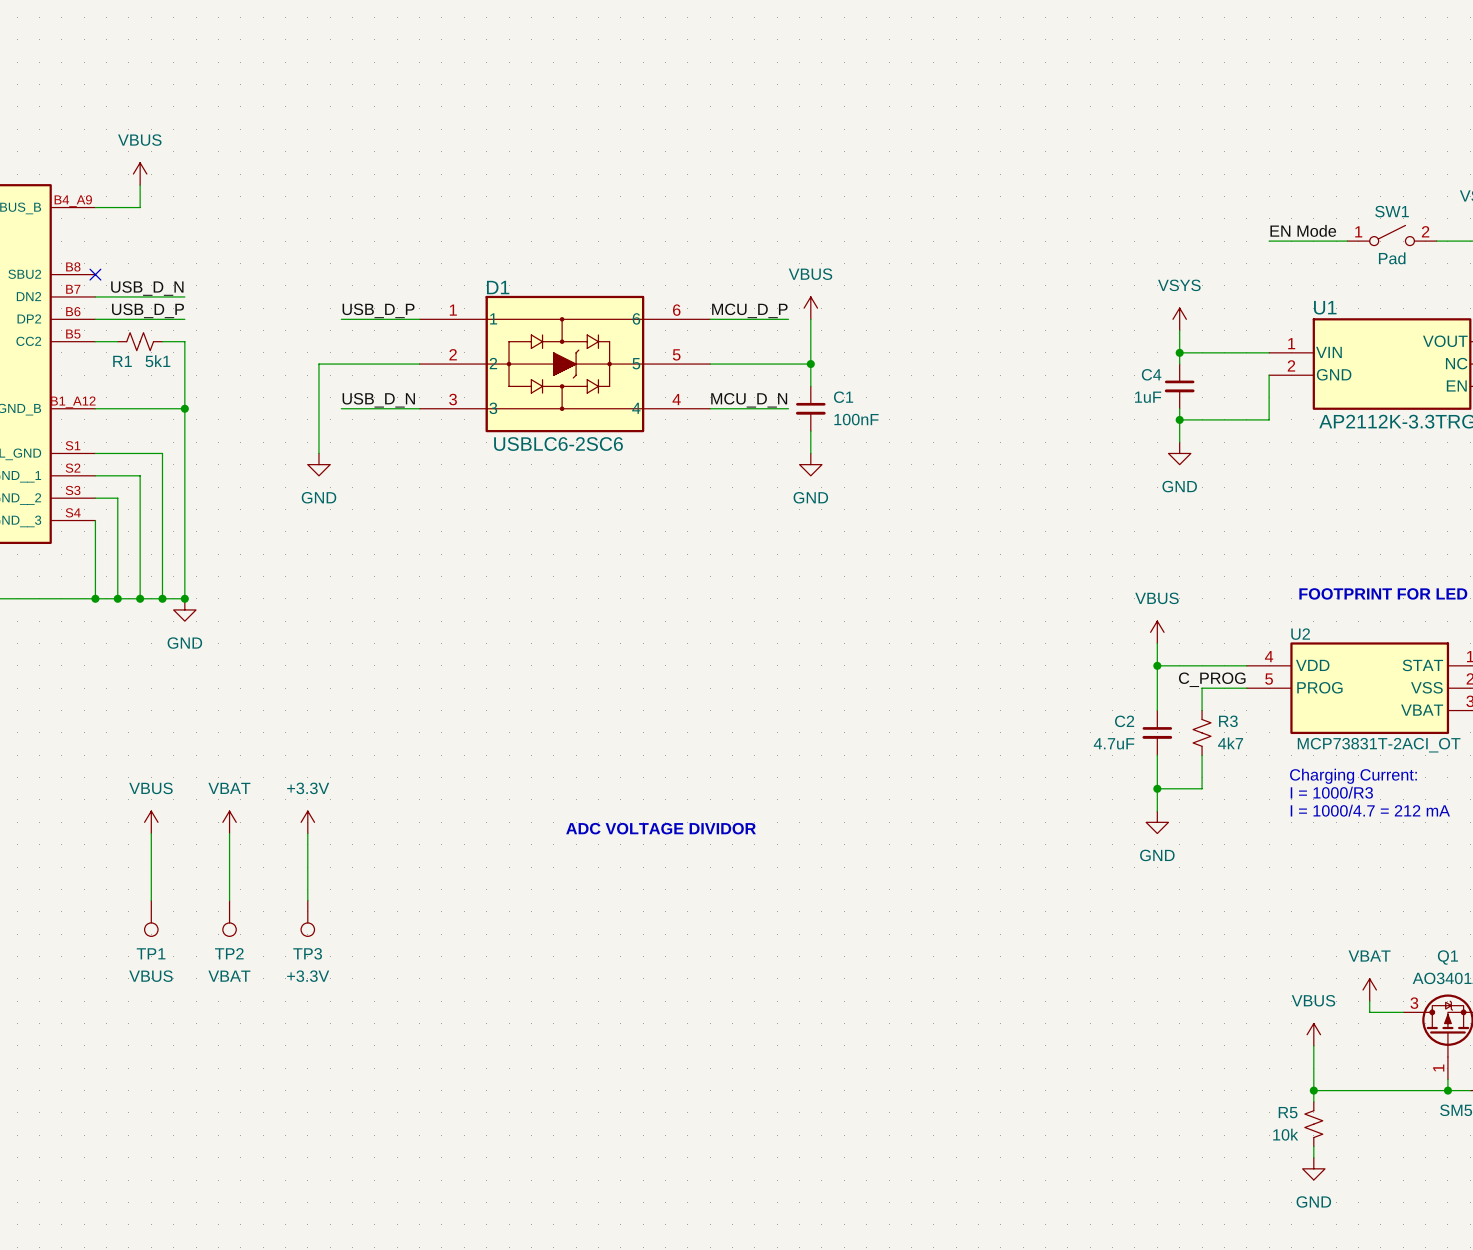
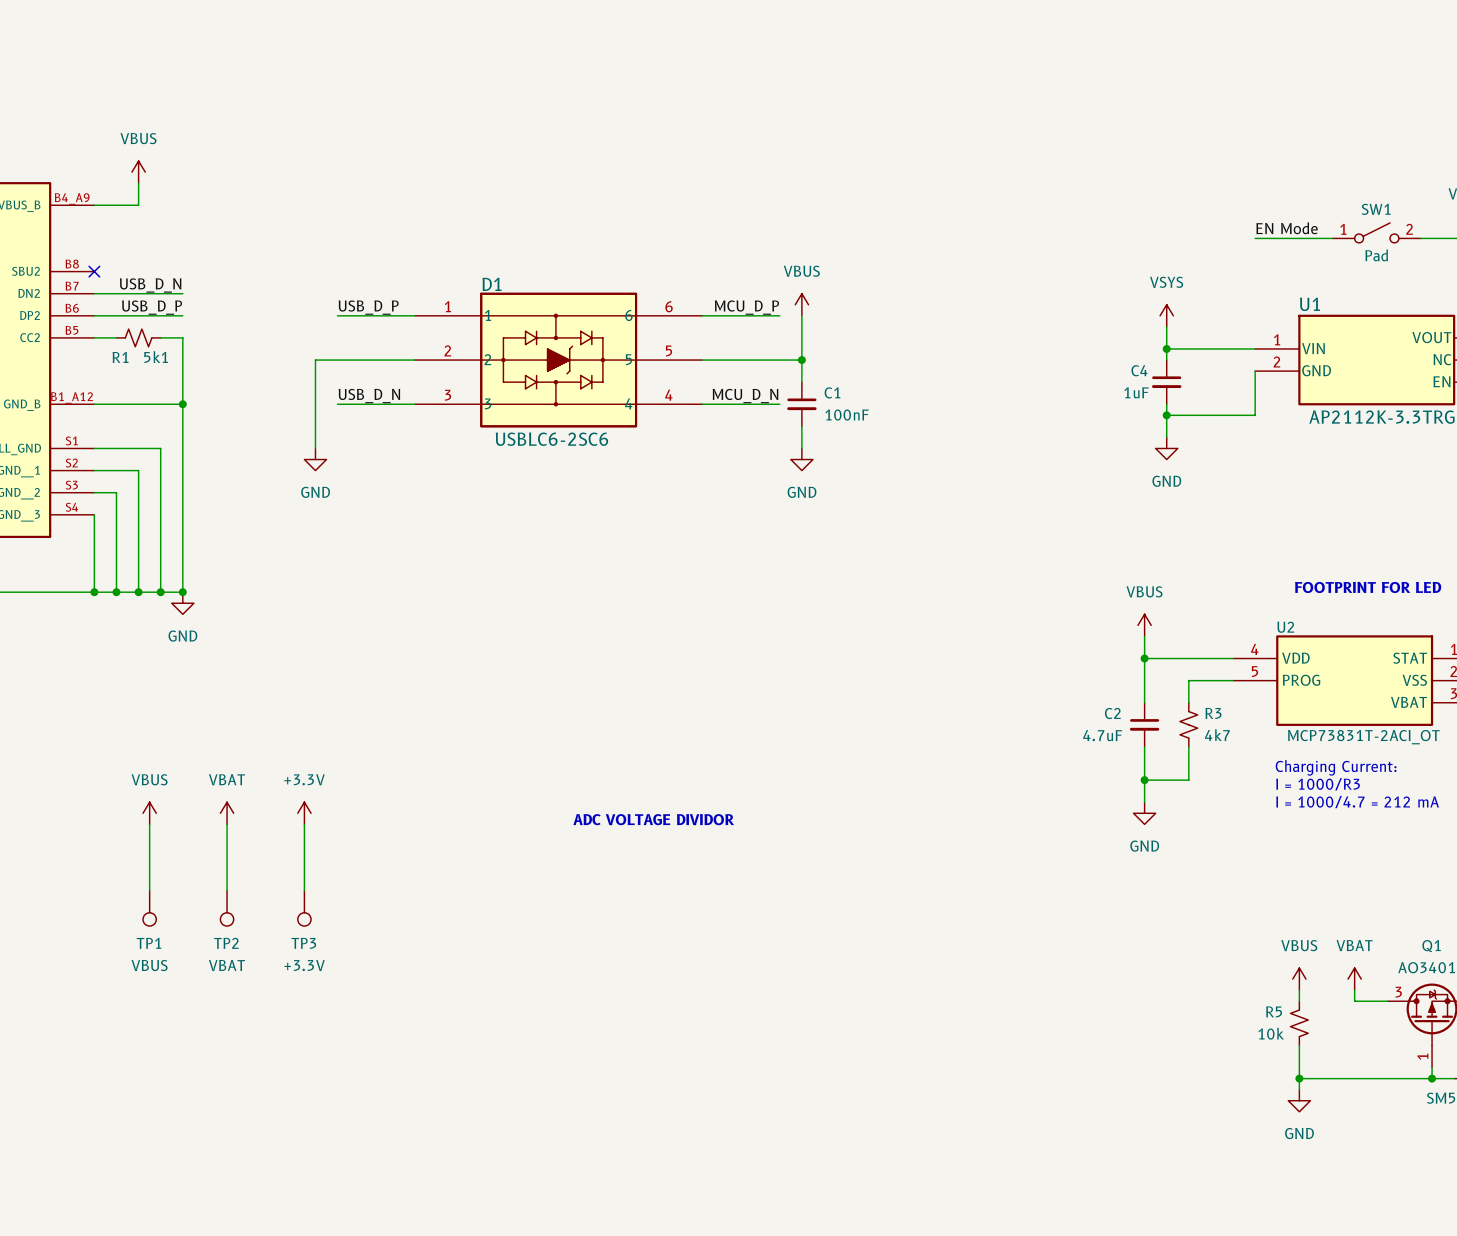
label: C_PROG (1212, 679) -> none
power symbol position: VBUS (1313, 1034) -> VBUS (1299, 979)
R5 position: (1313, 1124) -> (1299, 1023)
wire: (1313, 1146) (1313, 1157) -> none
power symbol position: GND (1313, 1168) -> GND (1299, 1100)

